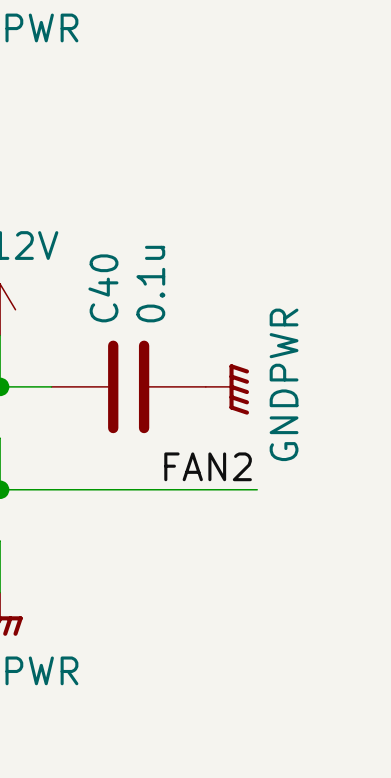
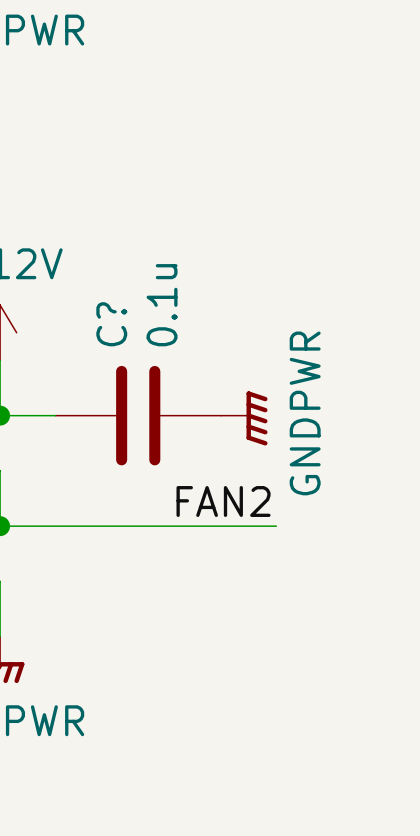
C40 name: C40 (103, 288) -> C? (111, 324)

